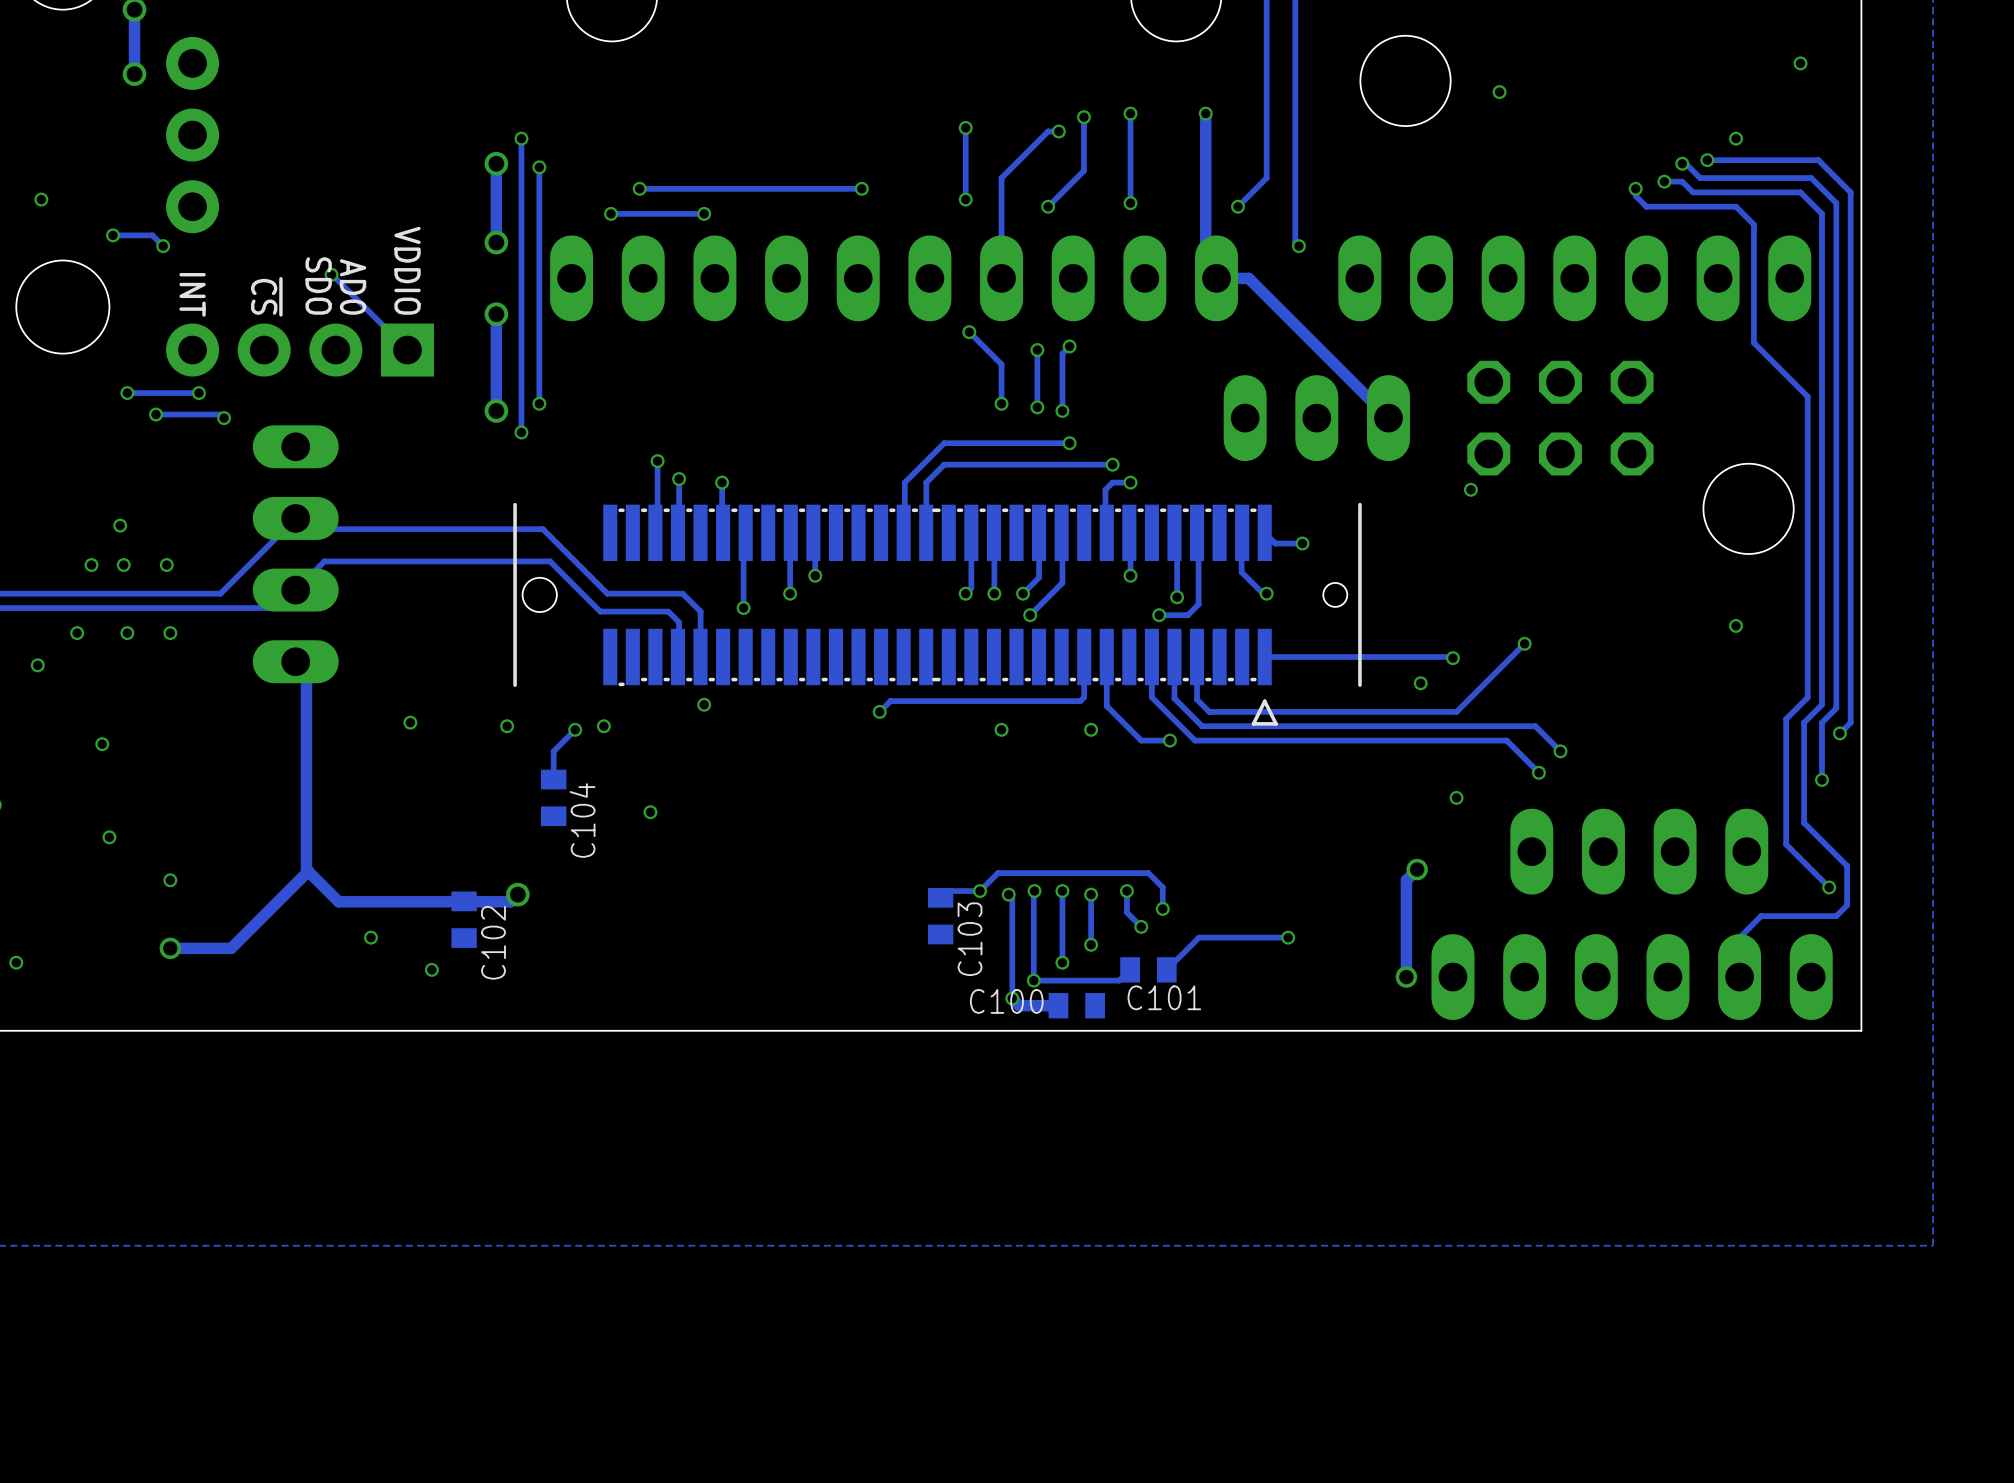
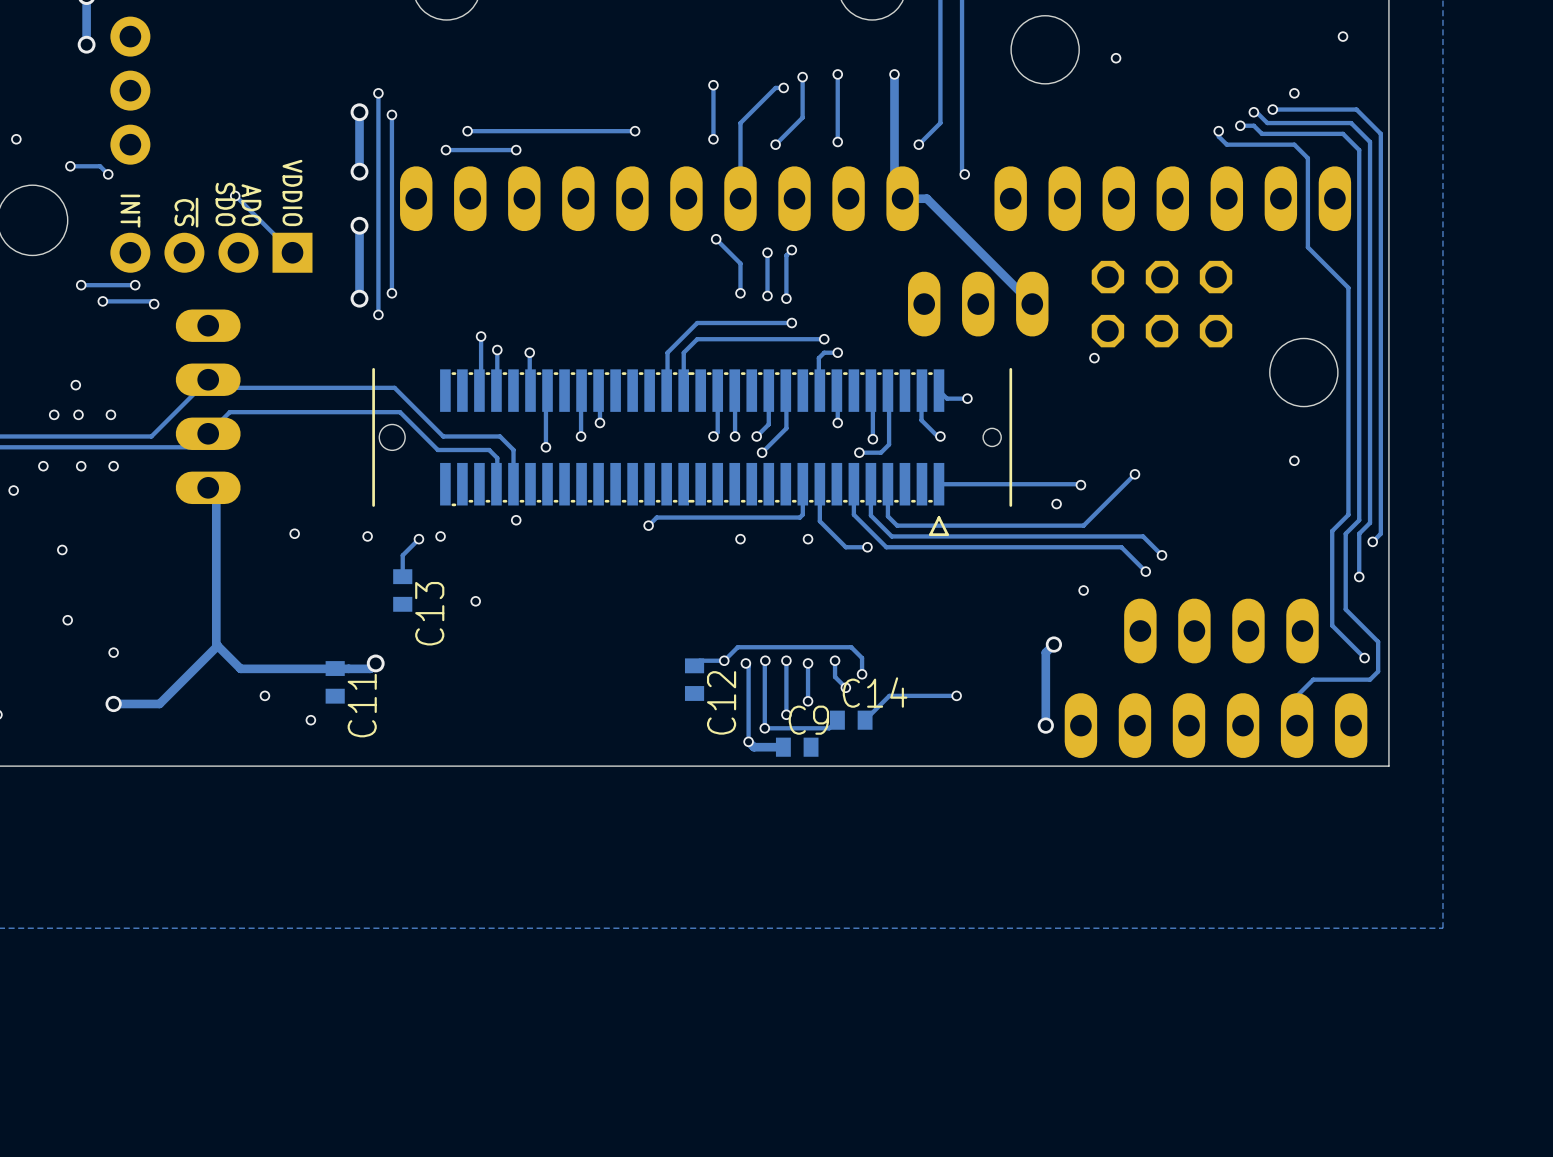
C104 name: C104 (582, 820) -> C13 (429, 613)
C103 name: C103 (970, 939) -> C12 (721, 702)
C102 name: C102 (493, 942) -> C11 (362, 705)
C101 name: C101 (1164, 997) -> C14 (875, 692)
C100 name: C100 (1006, 1001) -> C9 (808, 720)

